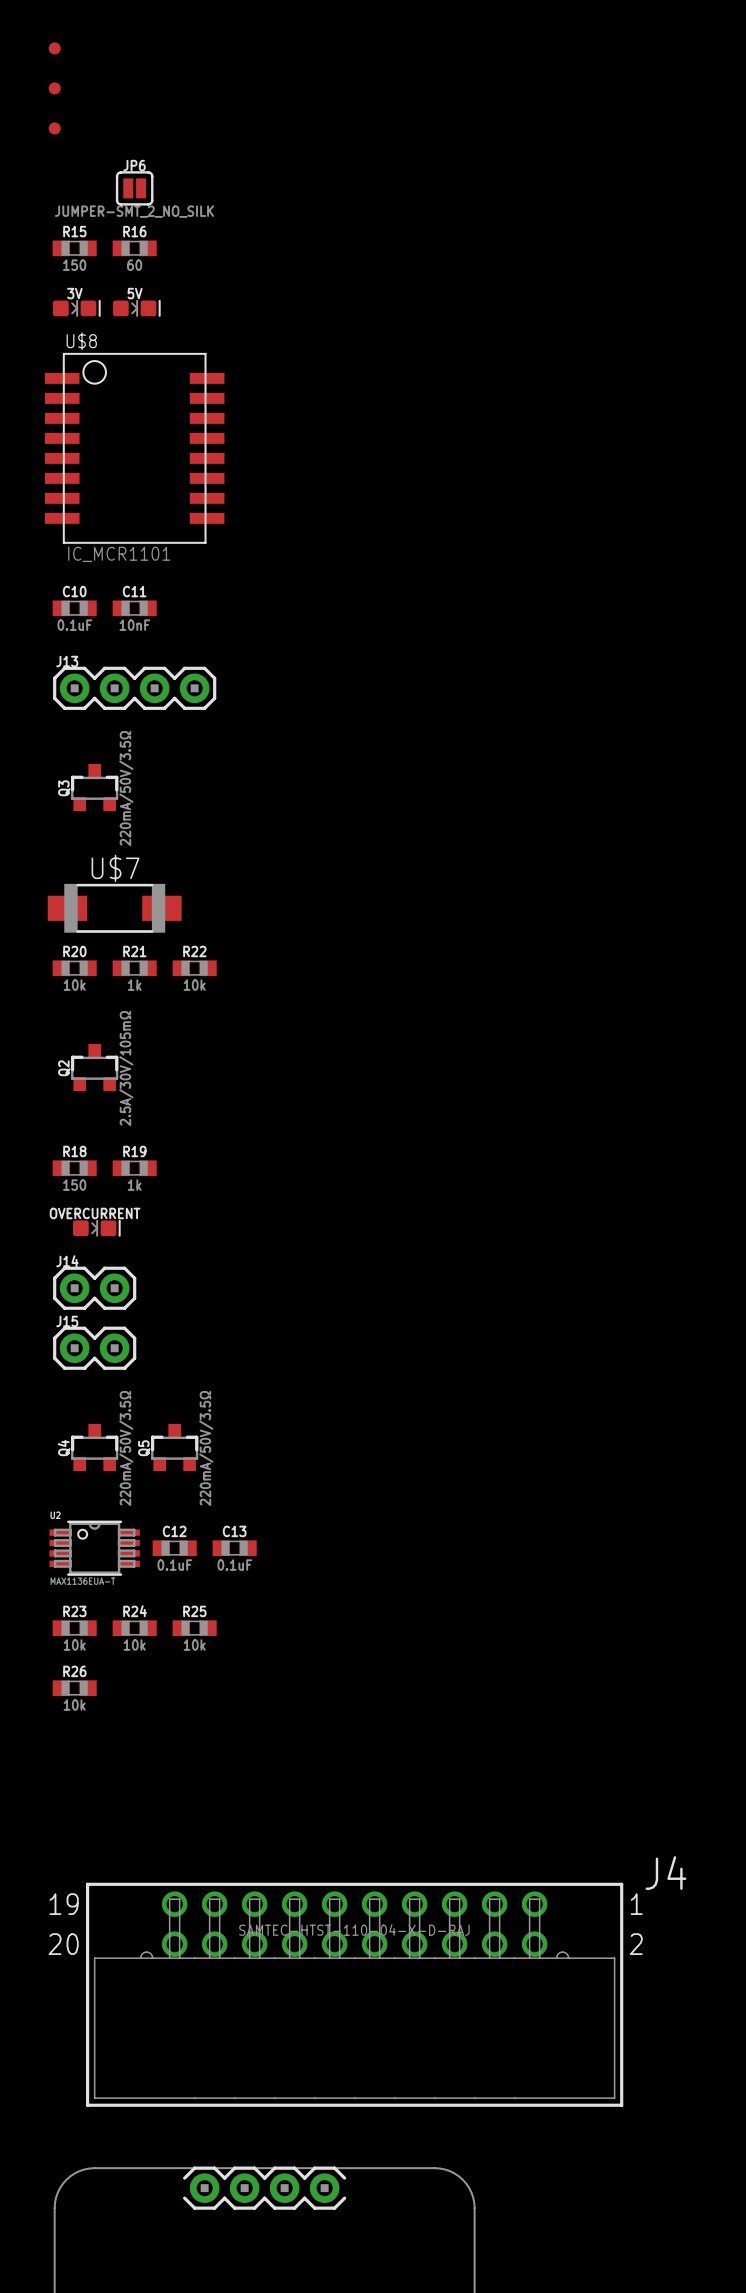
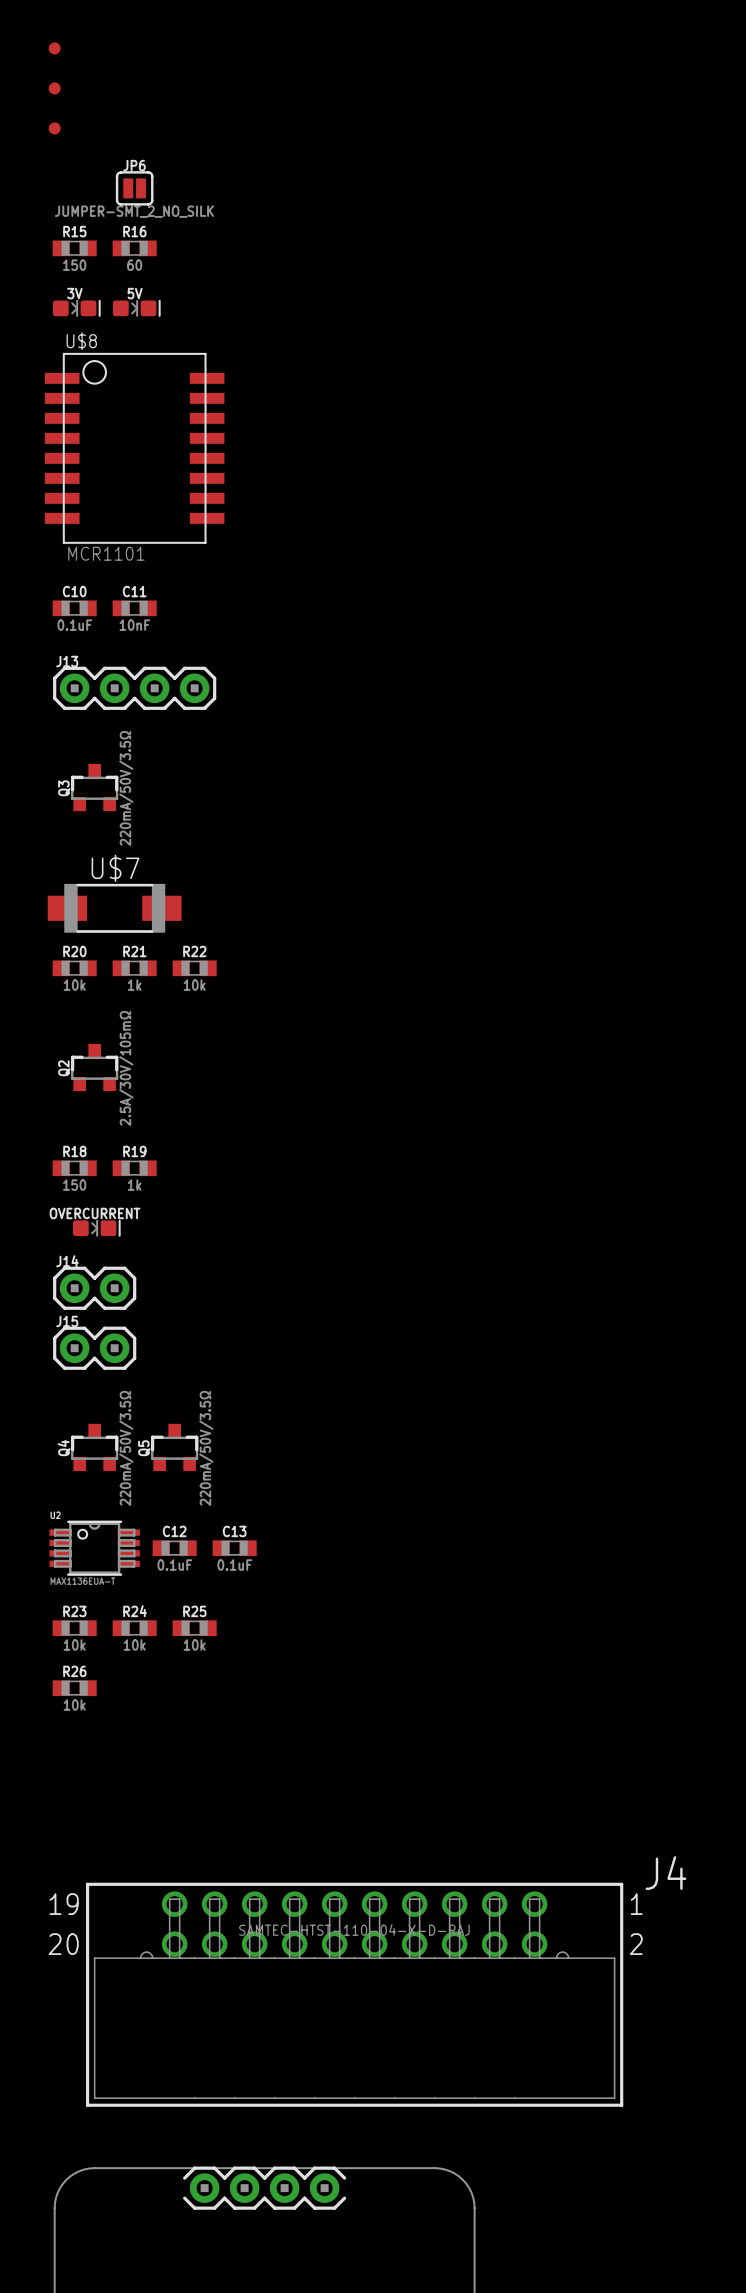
U$8 value: IC_MCR1101 (119, 554) -> MCR1101 (106, 553)

